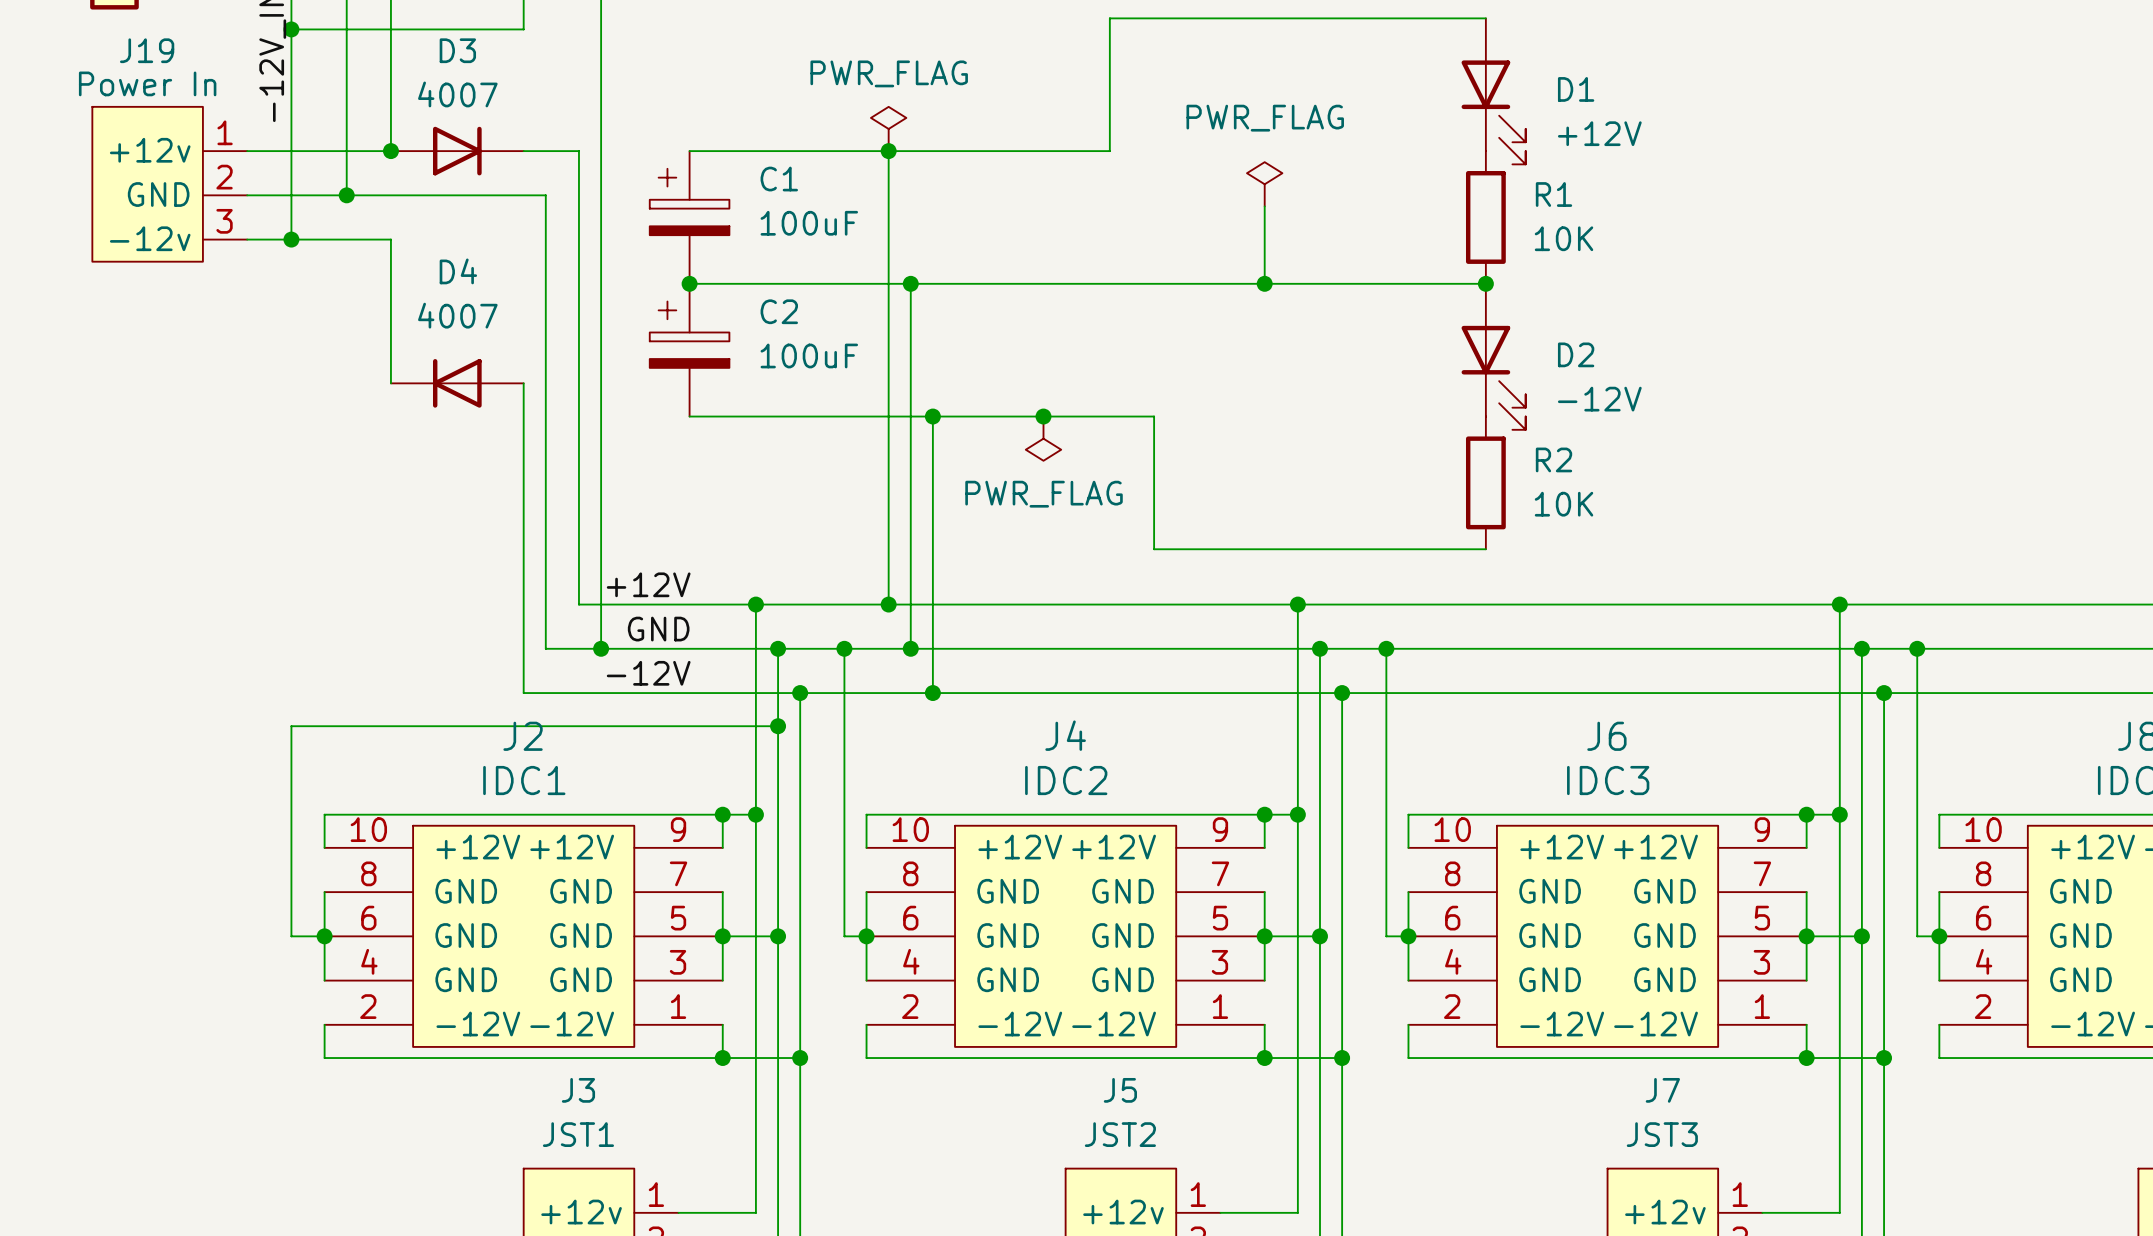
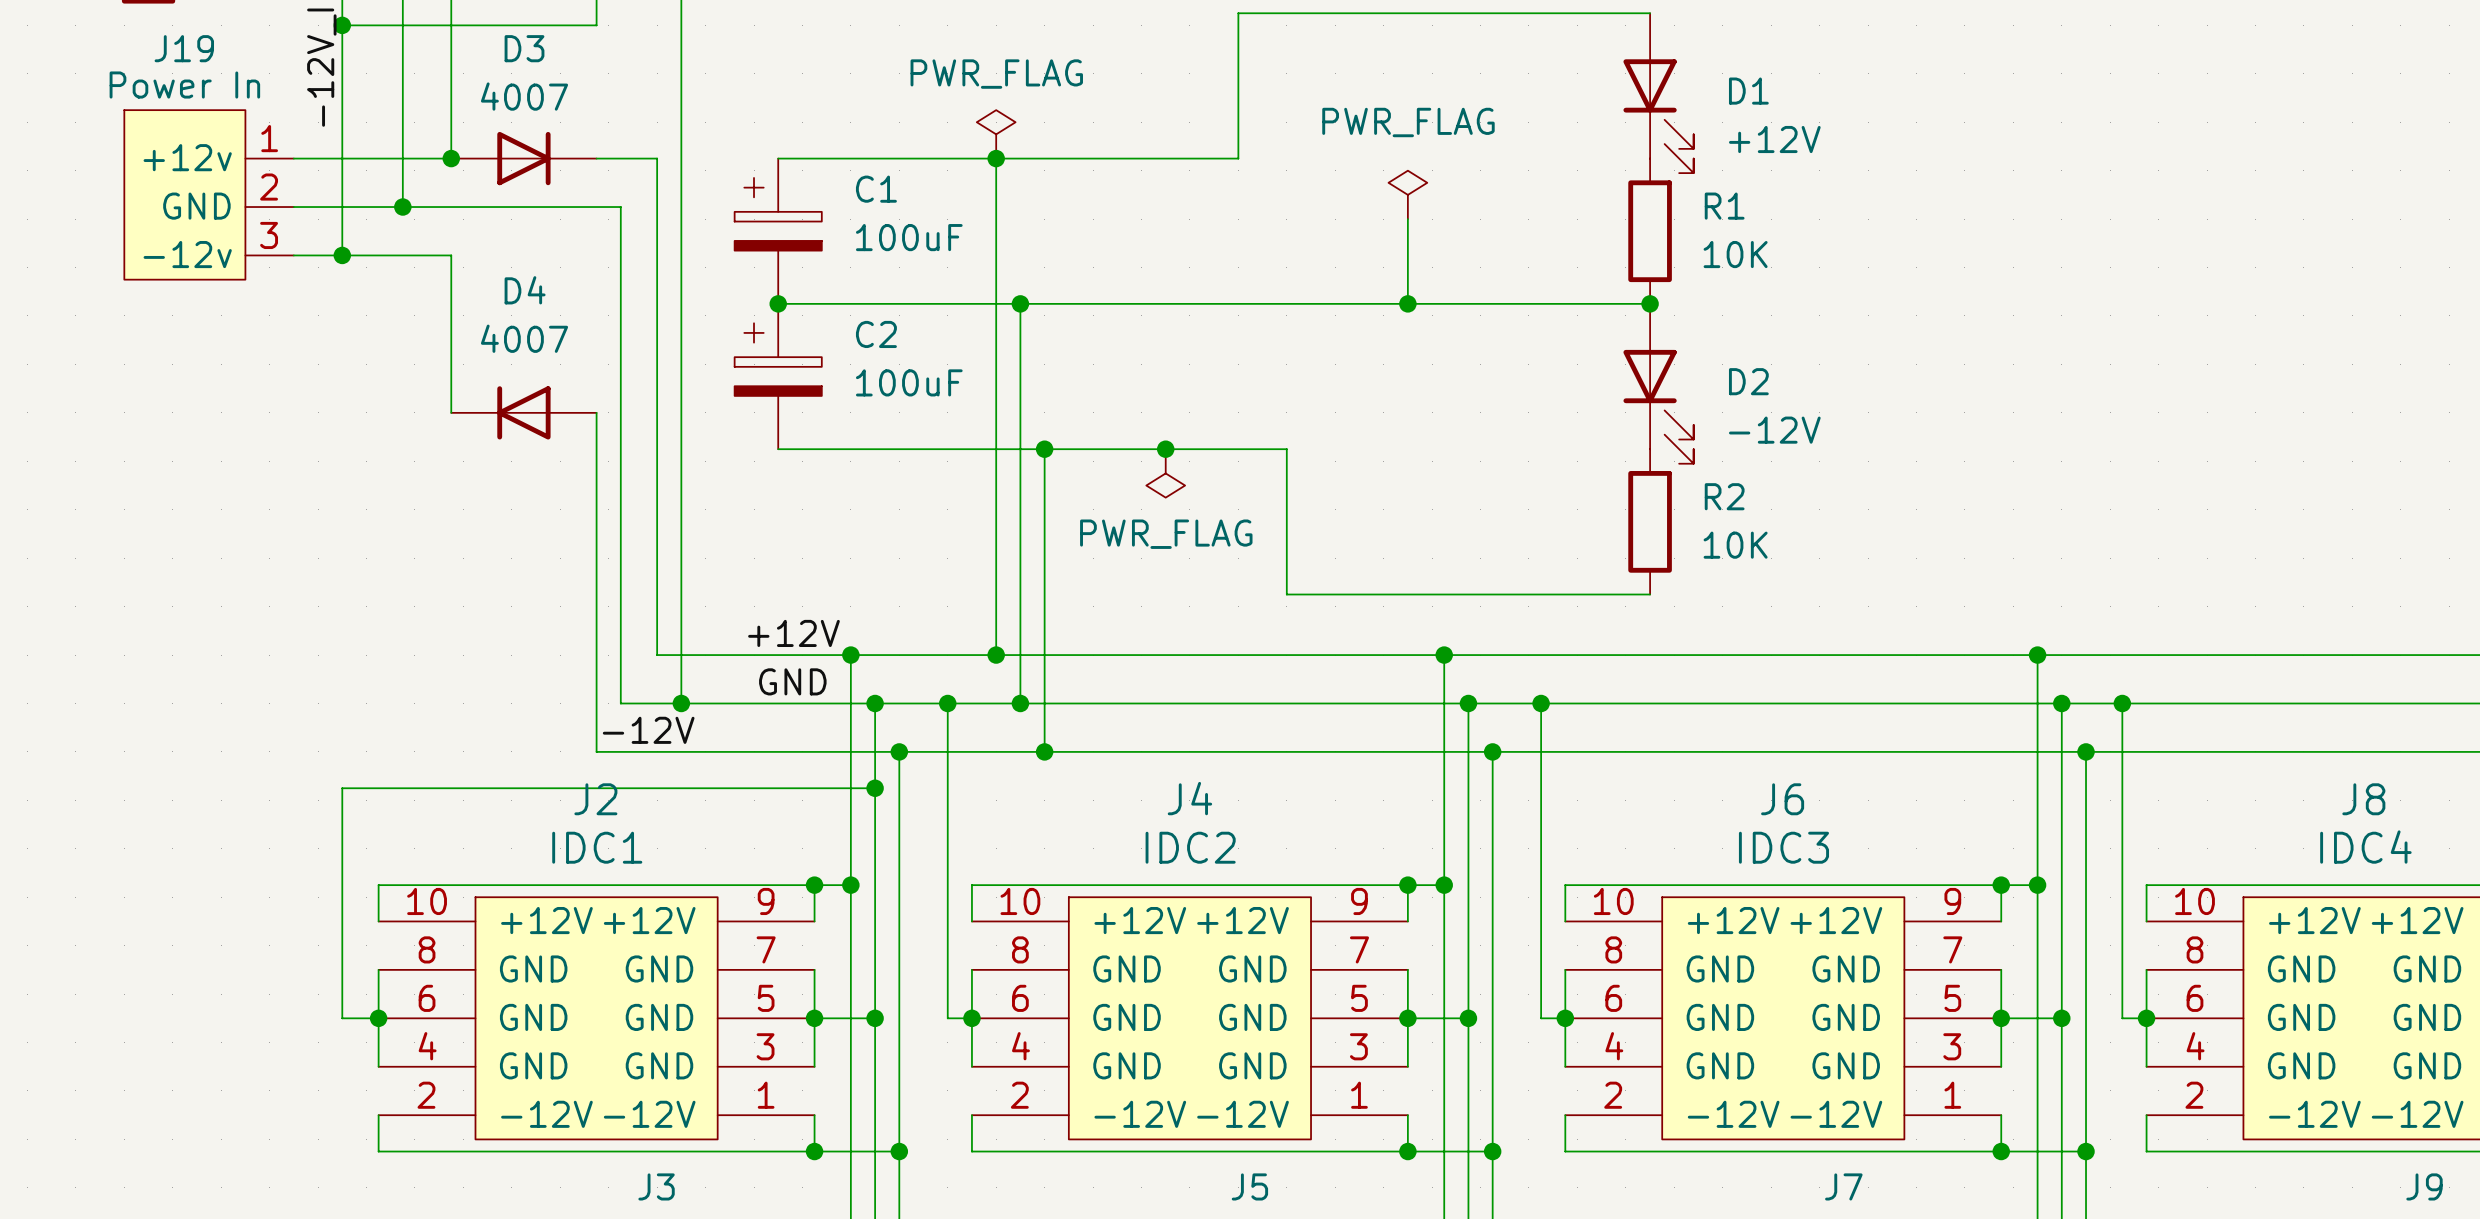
label position: +12V (648, 584) -> +12V (793, 633)
label position: GND (658, 629) -> GND (792, 681)
label position: -12V (648, 673) -> -12V (648, 730)

